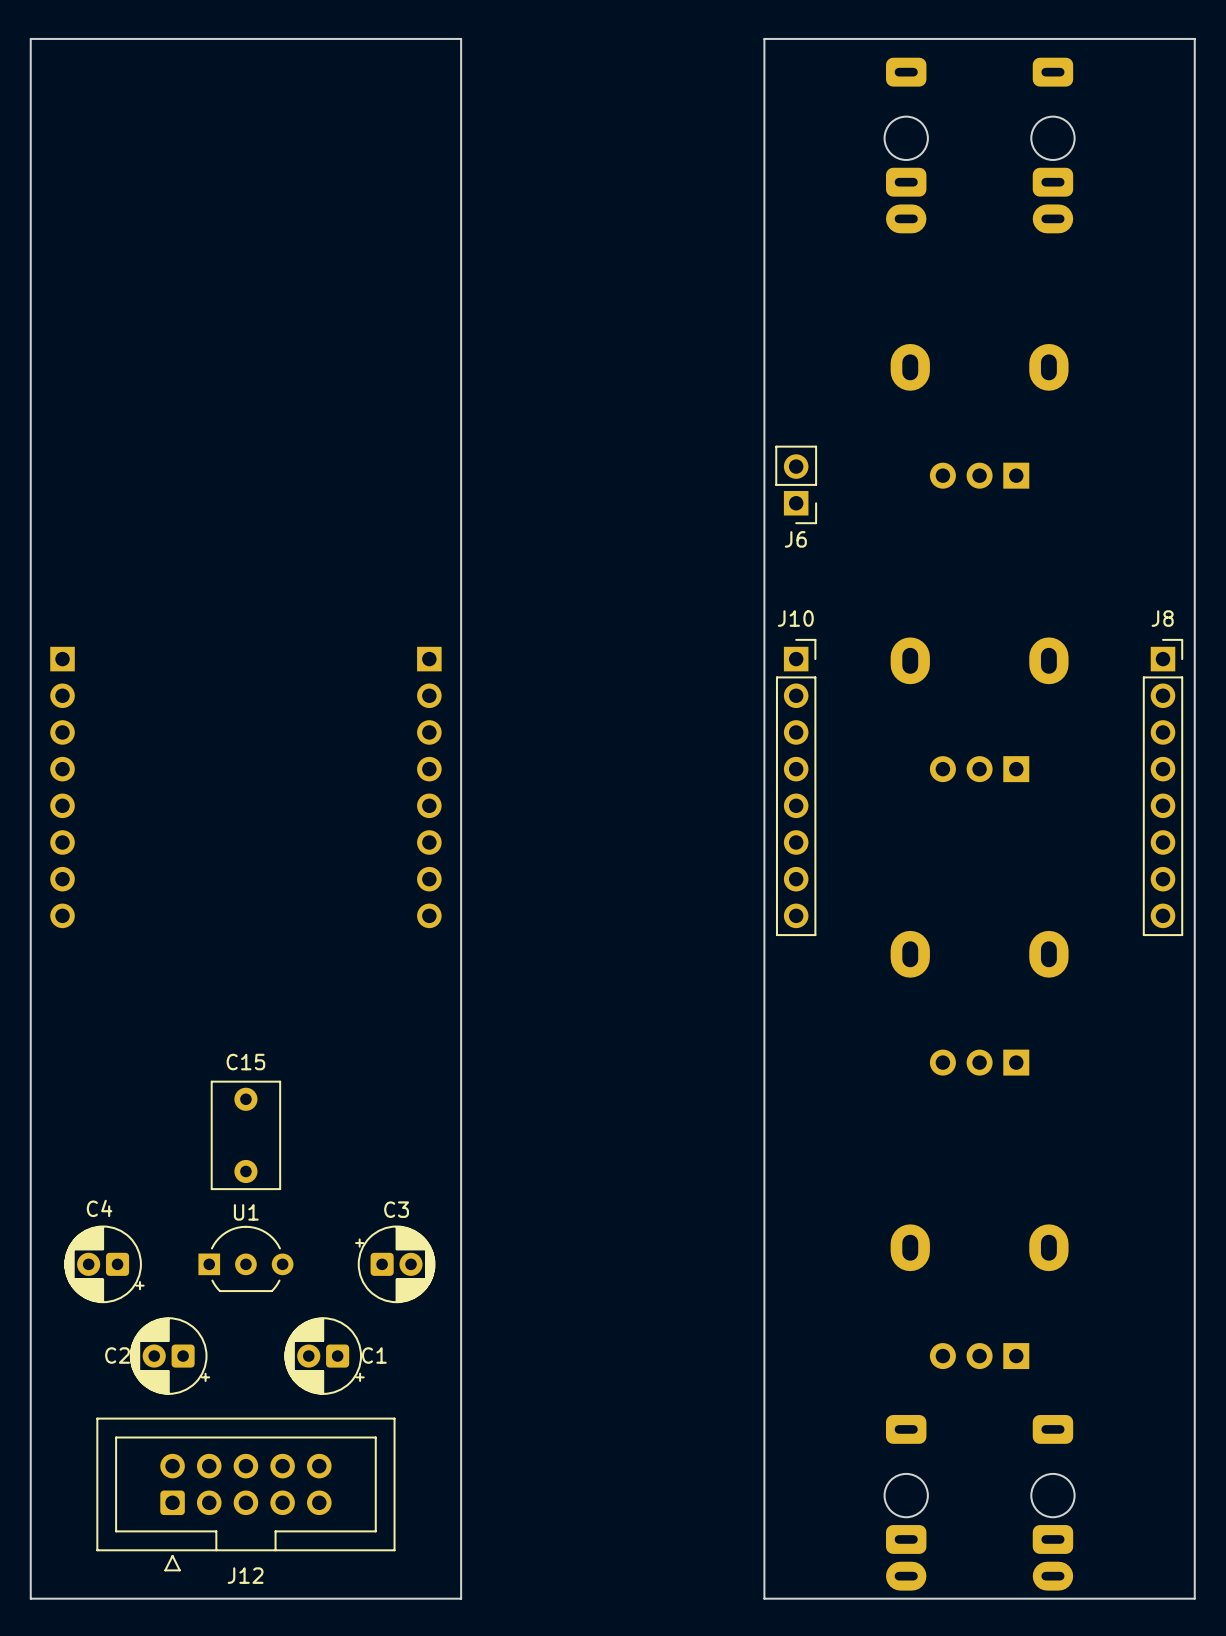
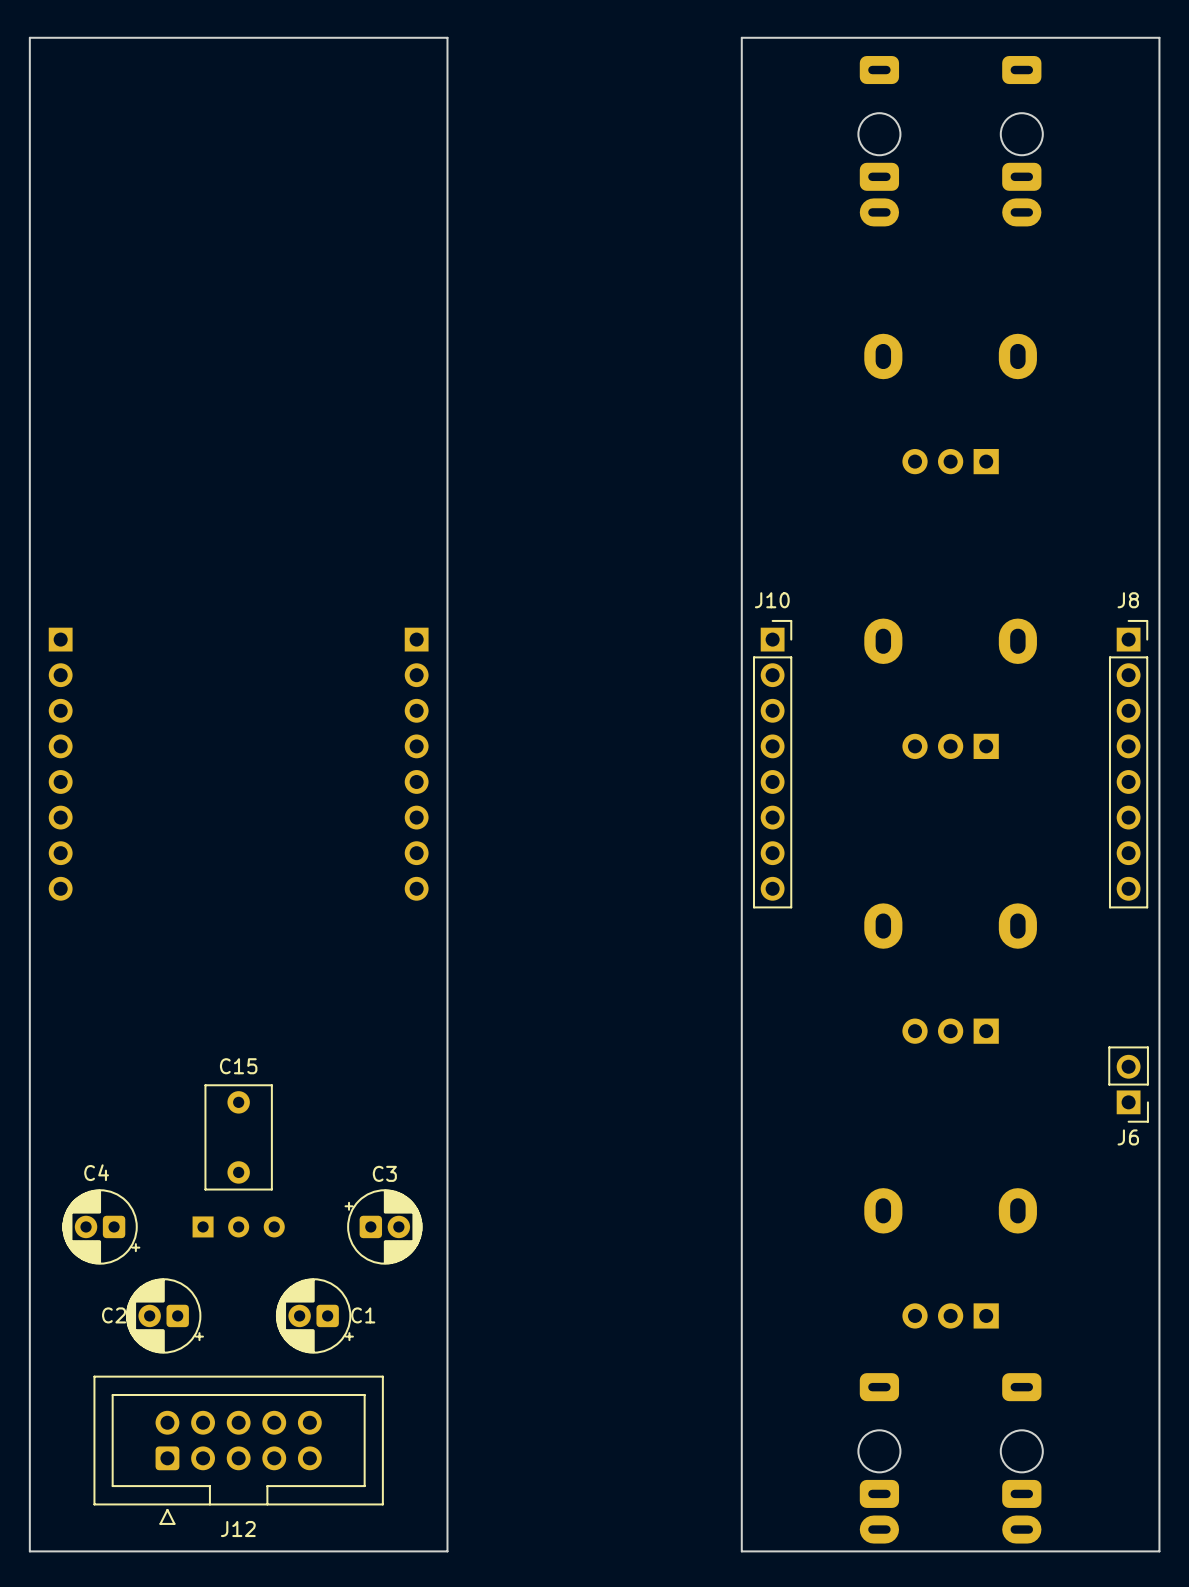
J6 position: (796, 484) -> (1128, 1084)
C15 position: (245, 1135) -> (238, 1137)
U1 side: bottom (245, 1258) -> top (238, 1226)

